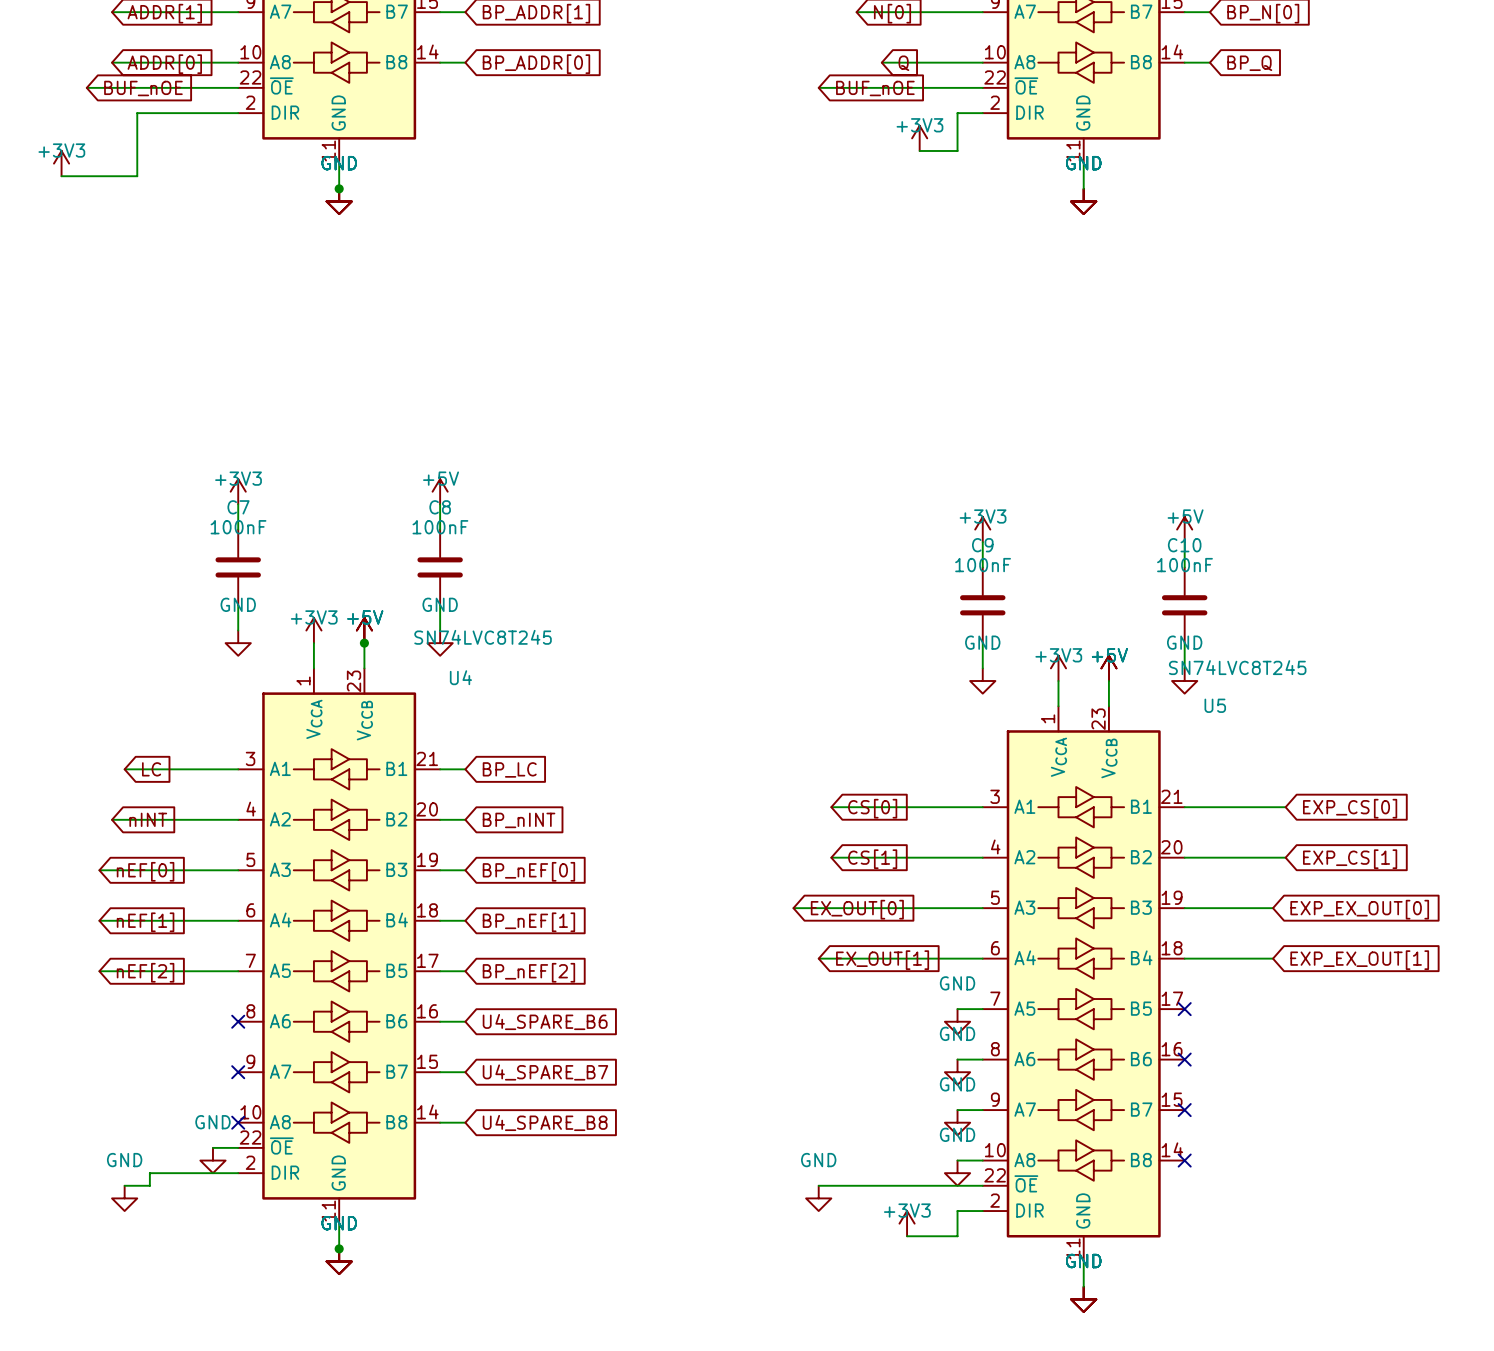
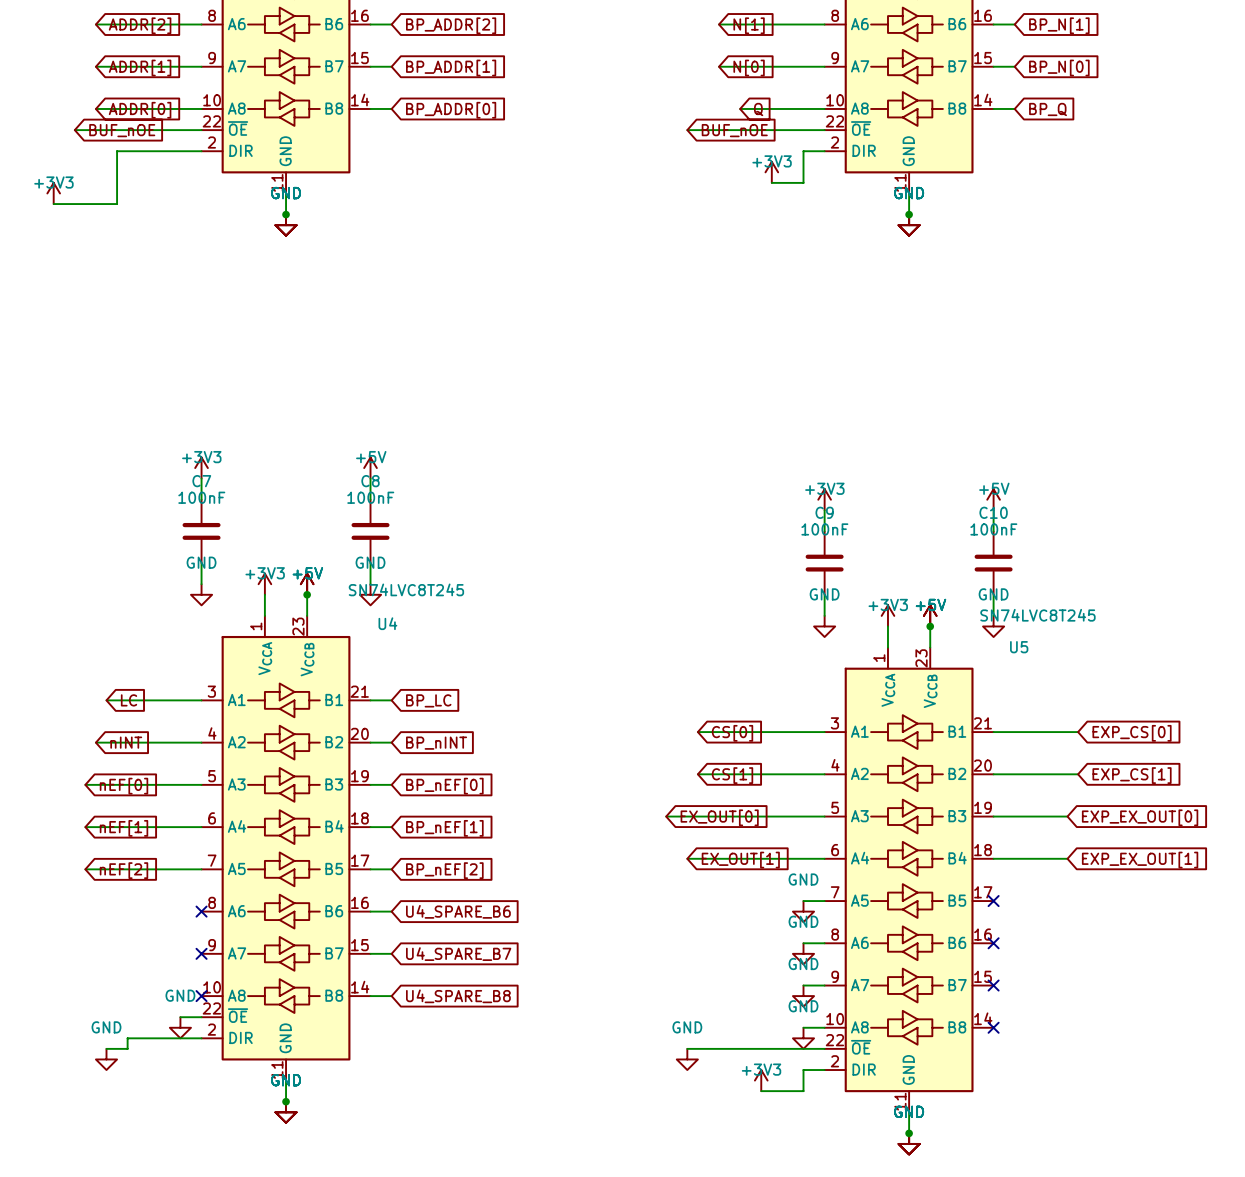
junction: none -> (909, 214)
junction: none -> (930, 626)
junction: none -> (909, 1133)

